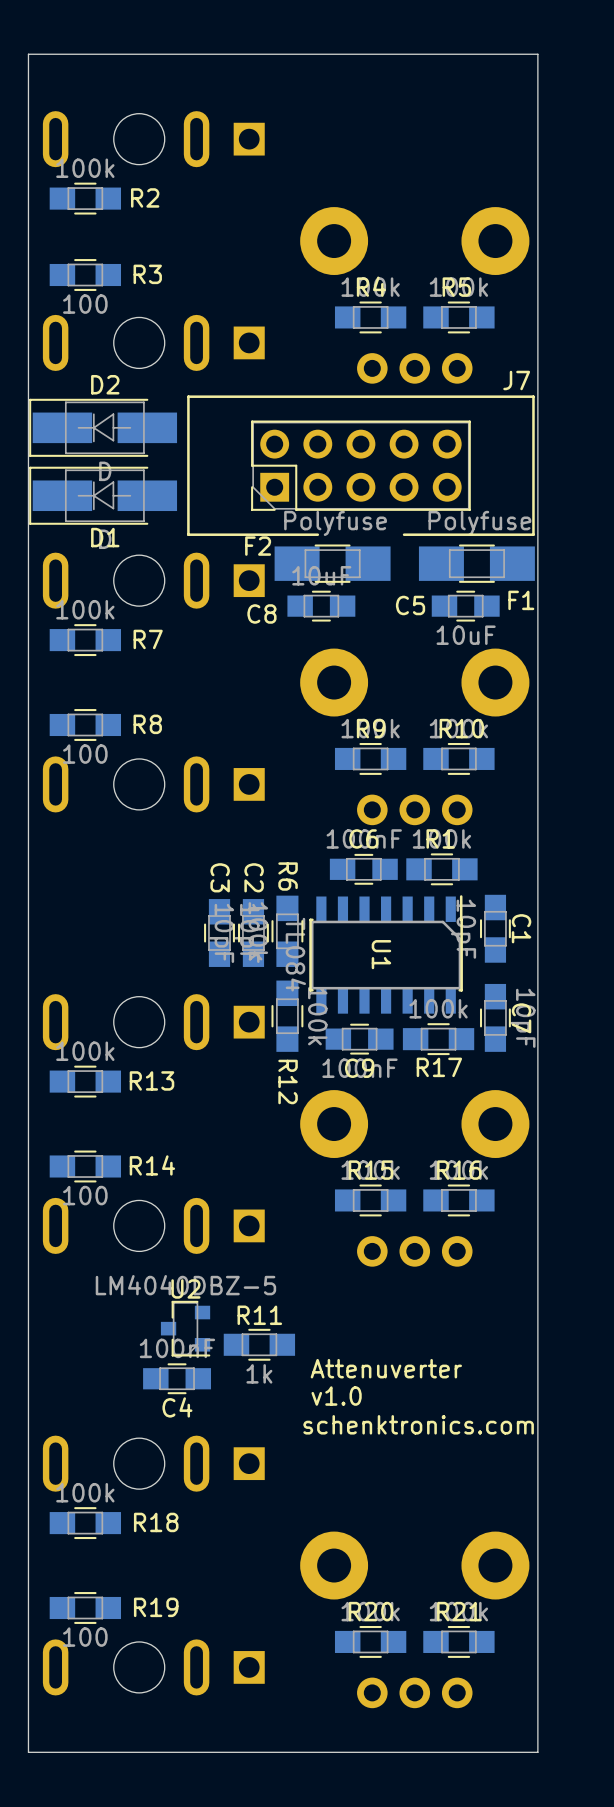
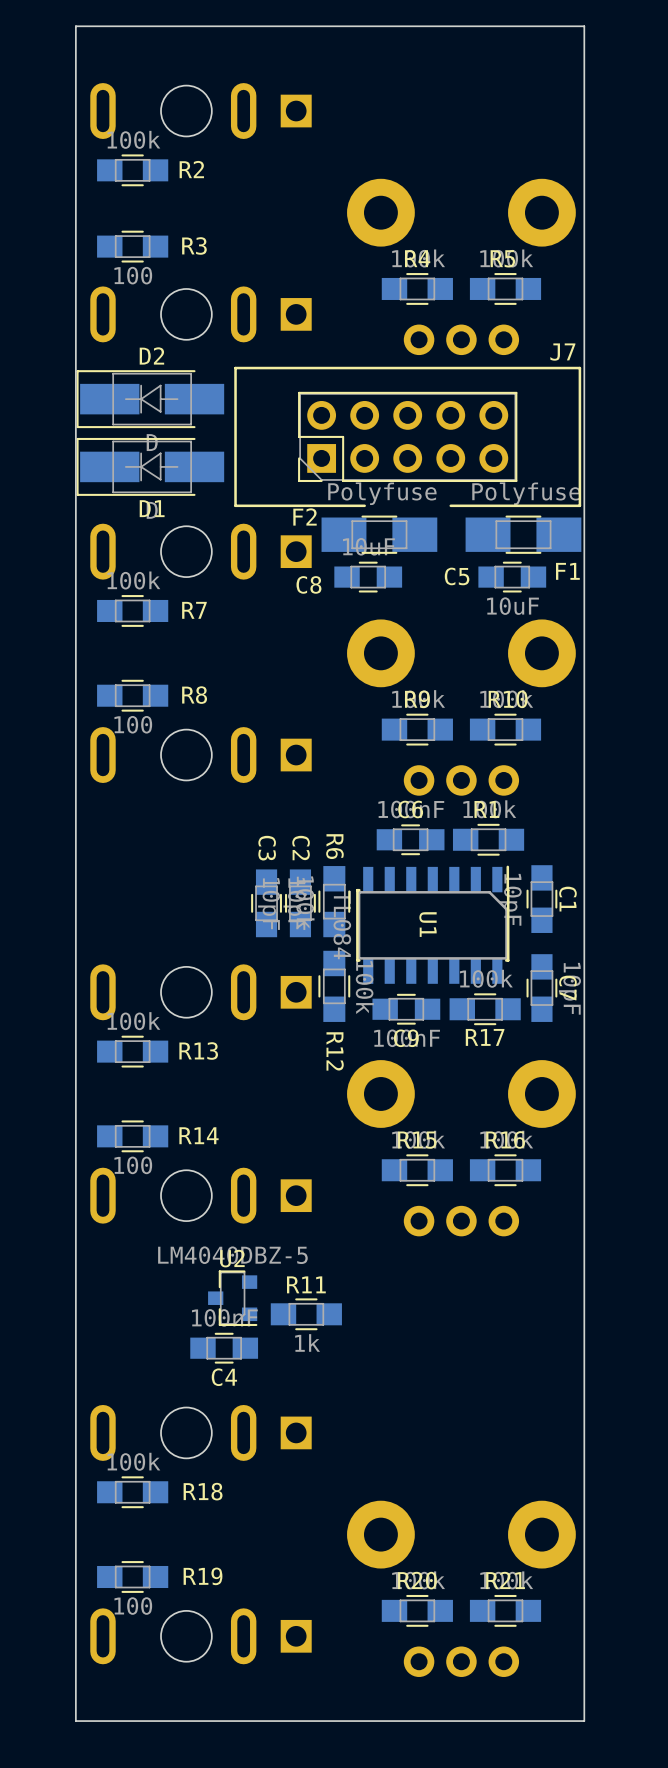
text: Attenuverter (386, 1368) -> none
text: v1.0 (336, 1396) -> none
text: schenktronics.com (418, 1424) -> none

